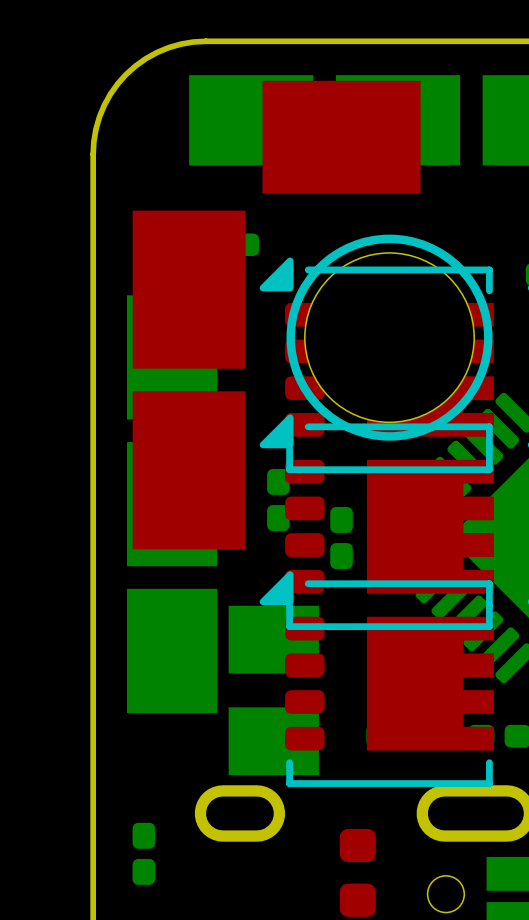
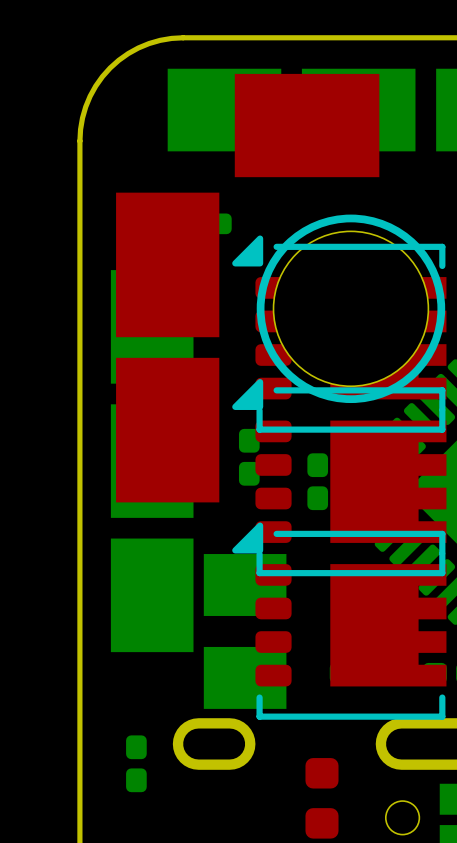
part position: (341, 538) -> (317, 481)
part position: (143, 853) -> (136, 763)

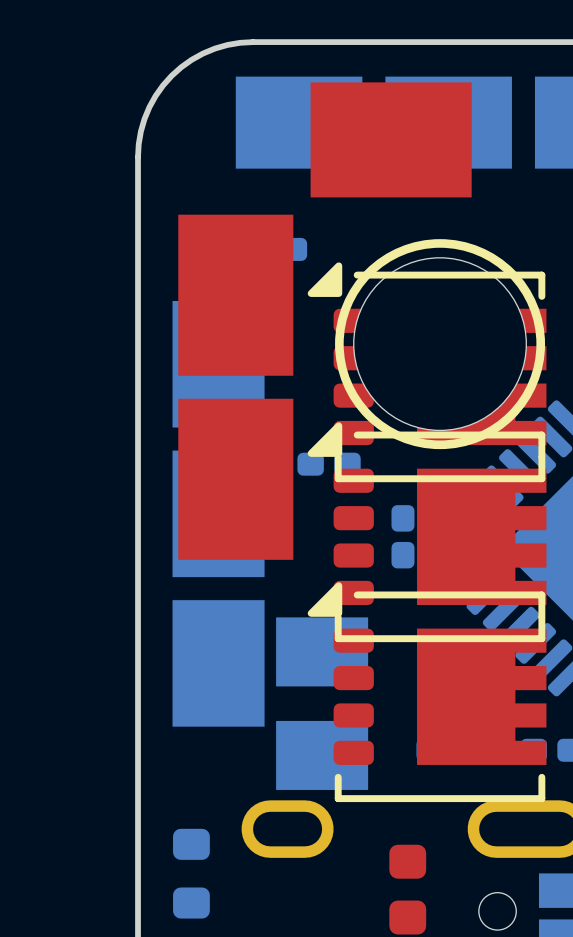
part rotation: 0° (249, 457) -> 90° clockwise (329, 464)
part position: (249, 457) -> (329, 464)
part footprint: [126, 735, 147, 793] -> [173, 828, 210, 919]

